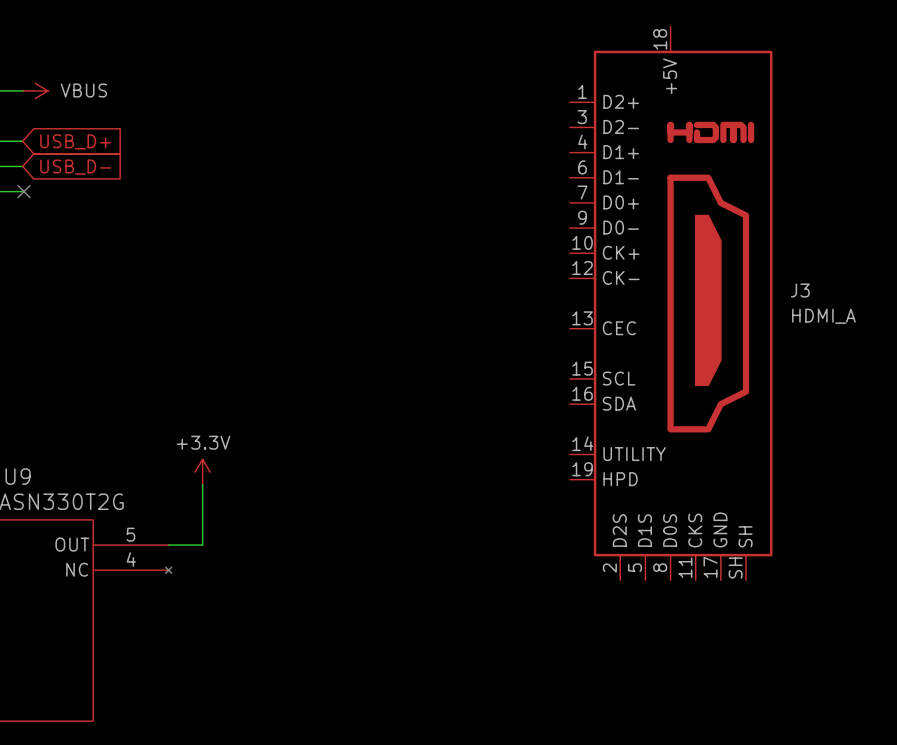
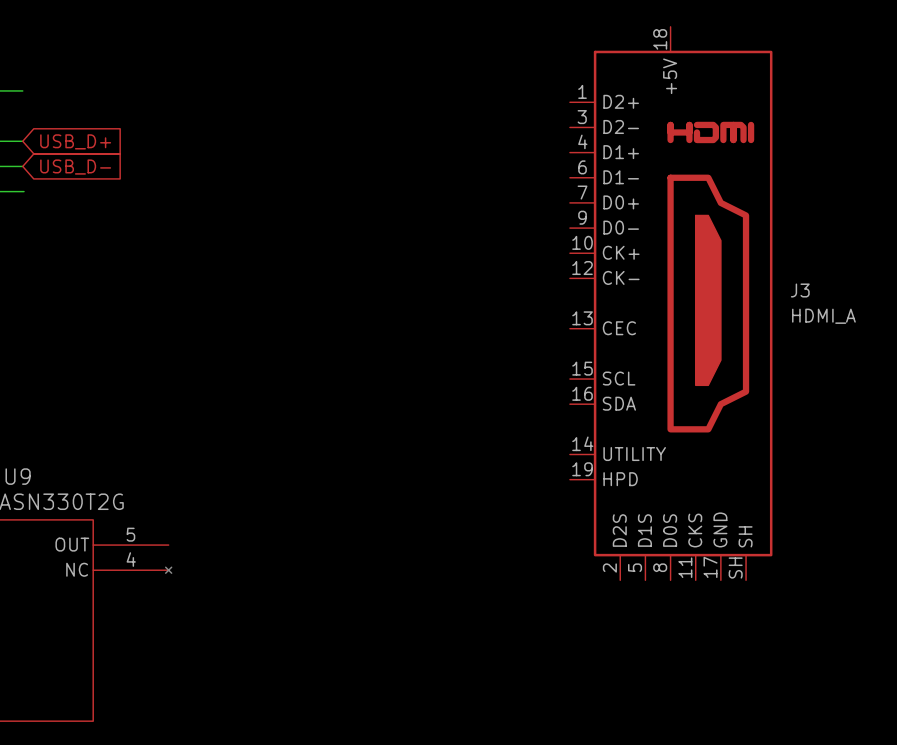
power symbol: VBUS (35, 90) -> none
no-connect mark: (24, 191) -> none
power symbol: +3.3V (202, 472) -> none
wire: (202, 484) (202, 545) (168, 545) -> none

